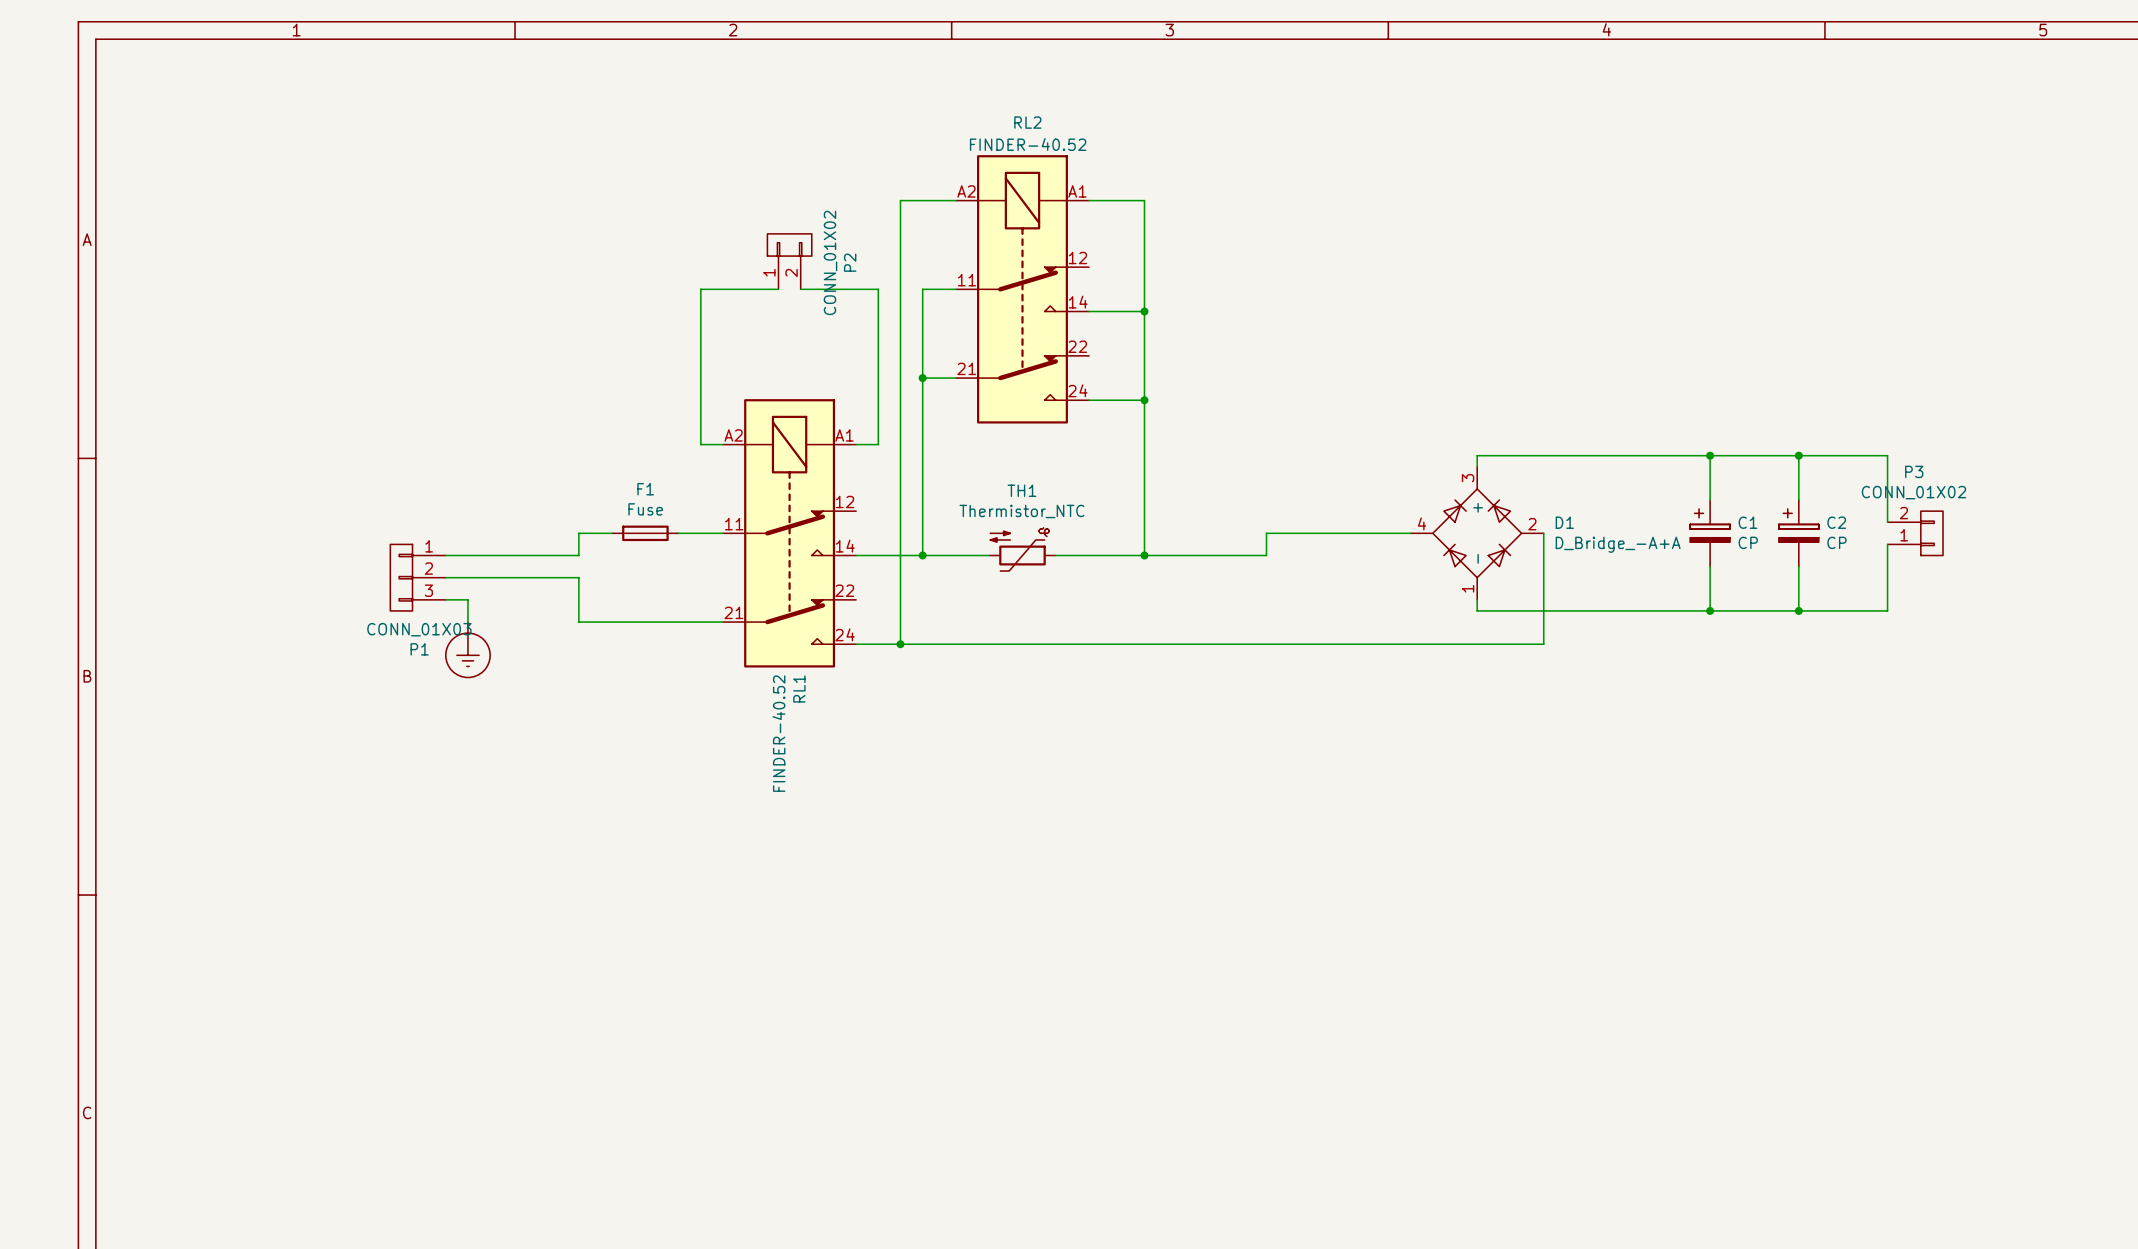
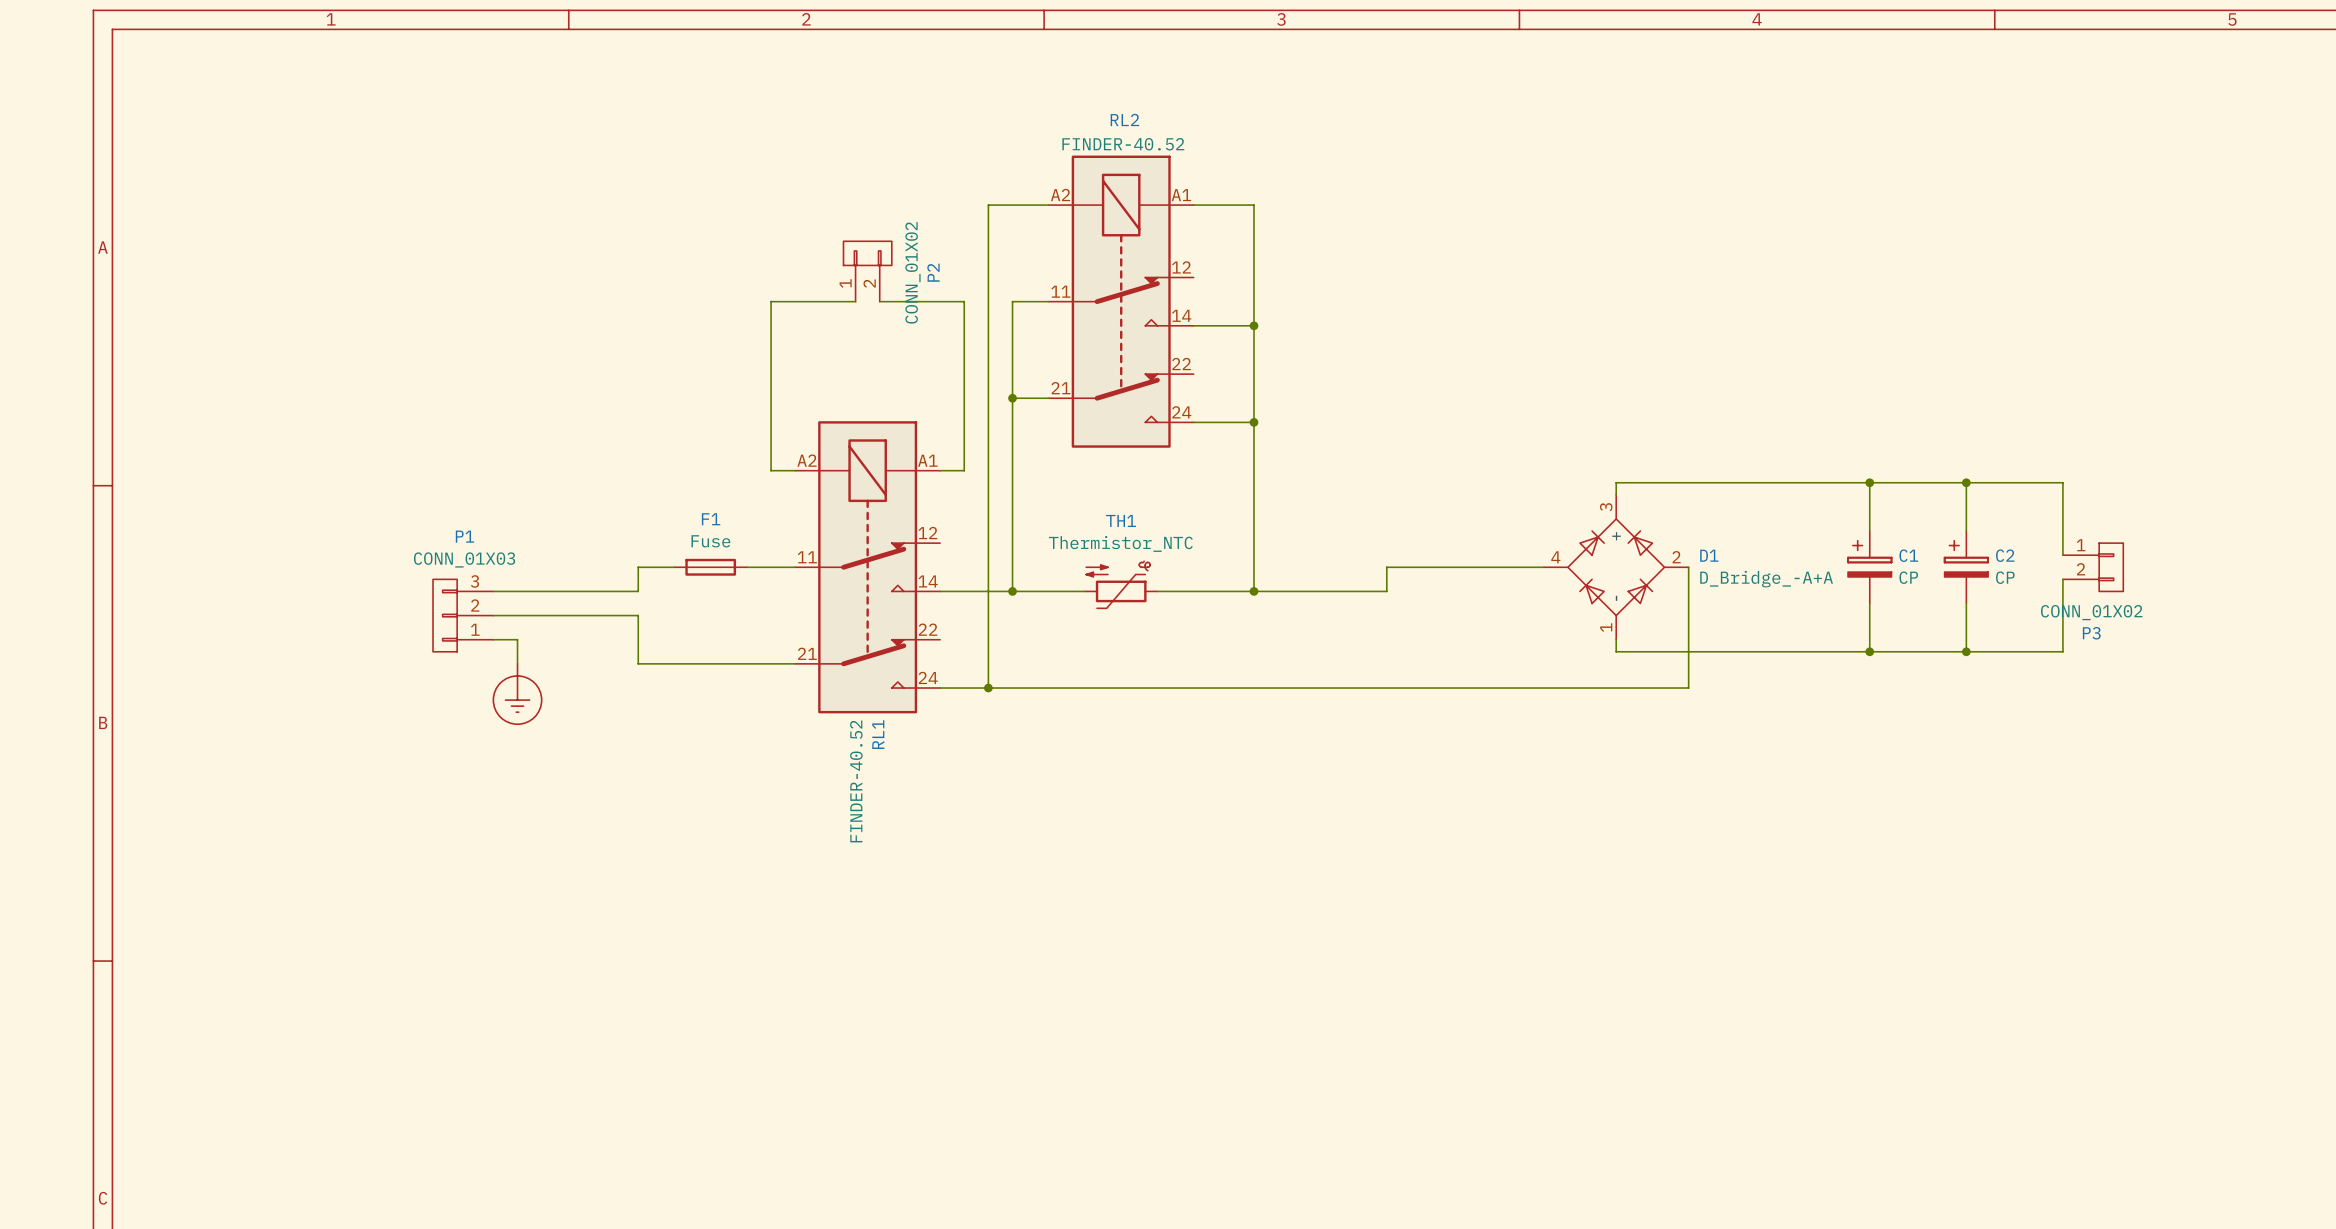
P3 flip: as is (1931, 533) -> up-down (2111, 567)
P1 flip: as is (401, 577) -> up-down (445, 615)

